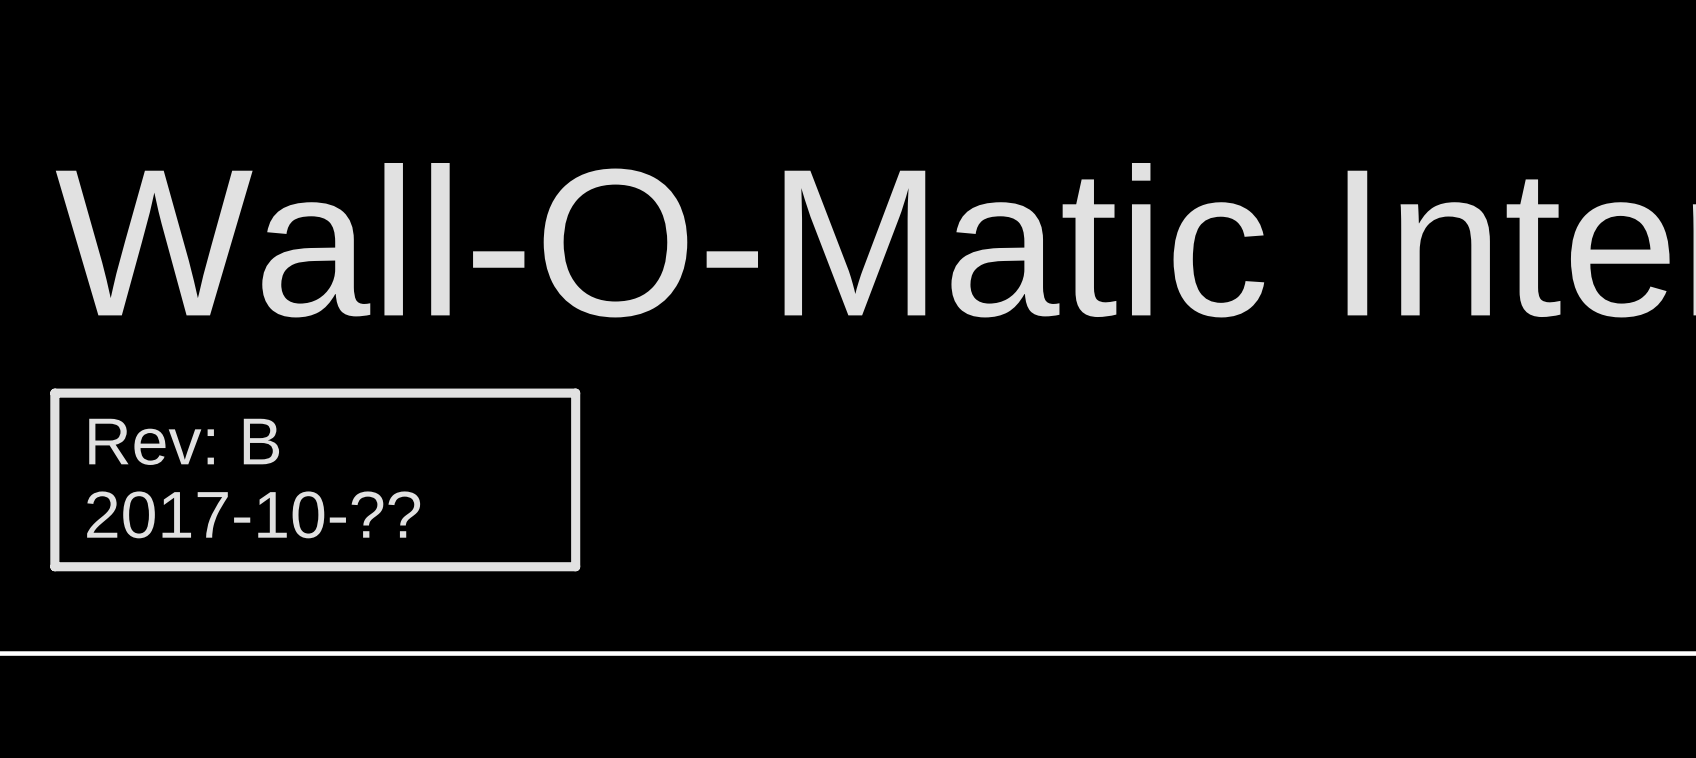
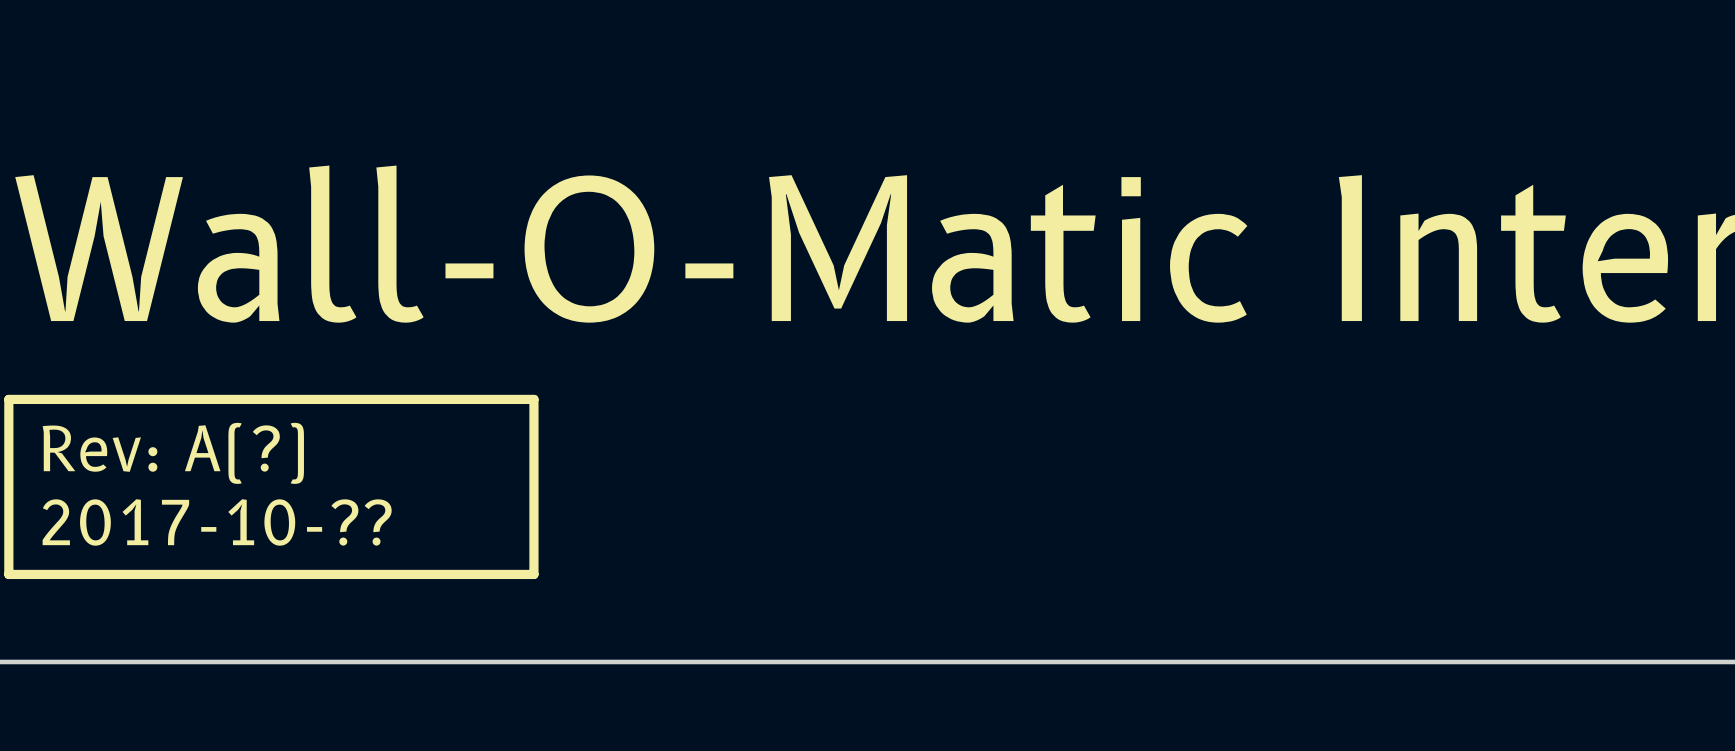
text: Rev: B (184, 441) -> Rev: A(?) (173, 453)

